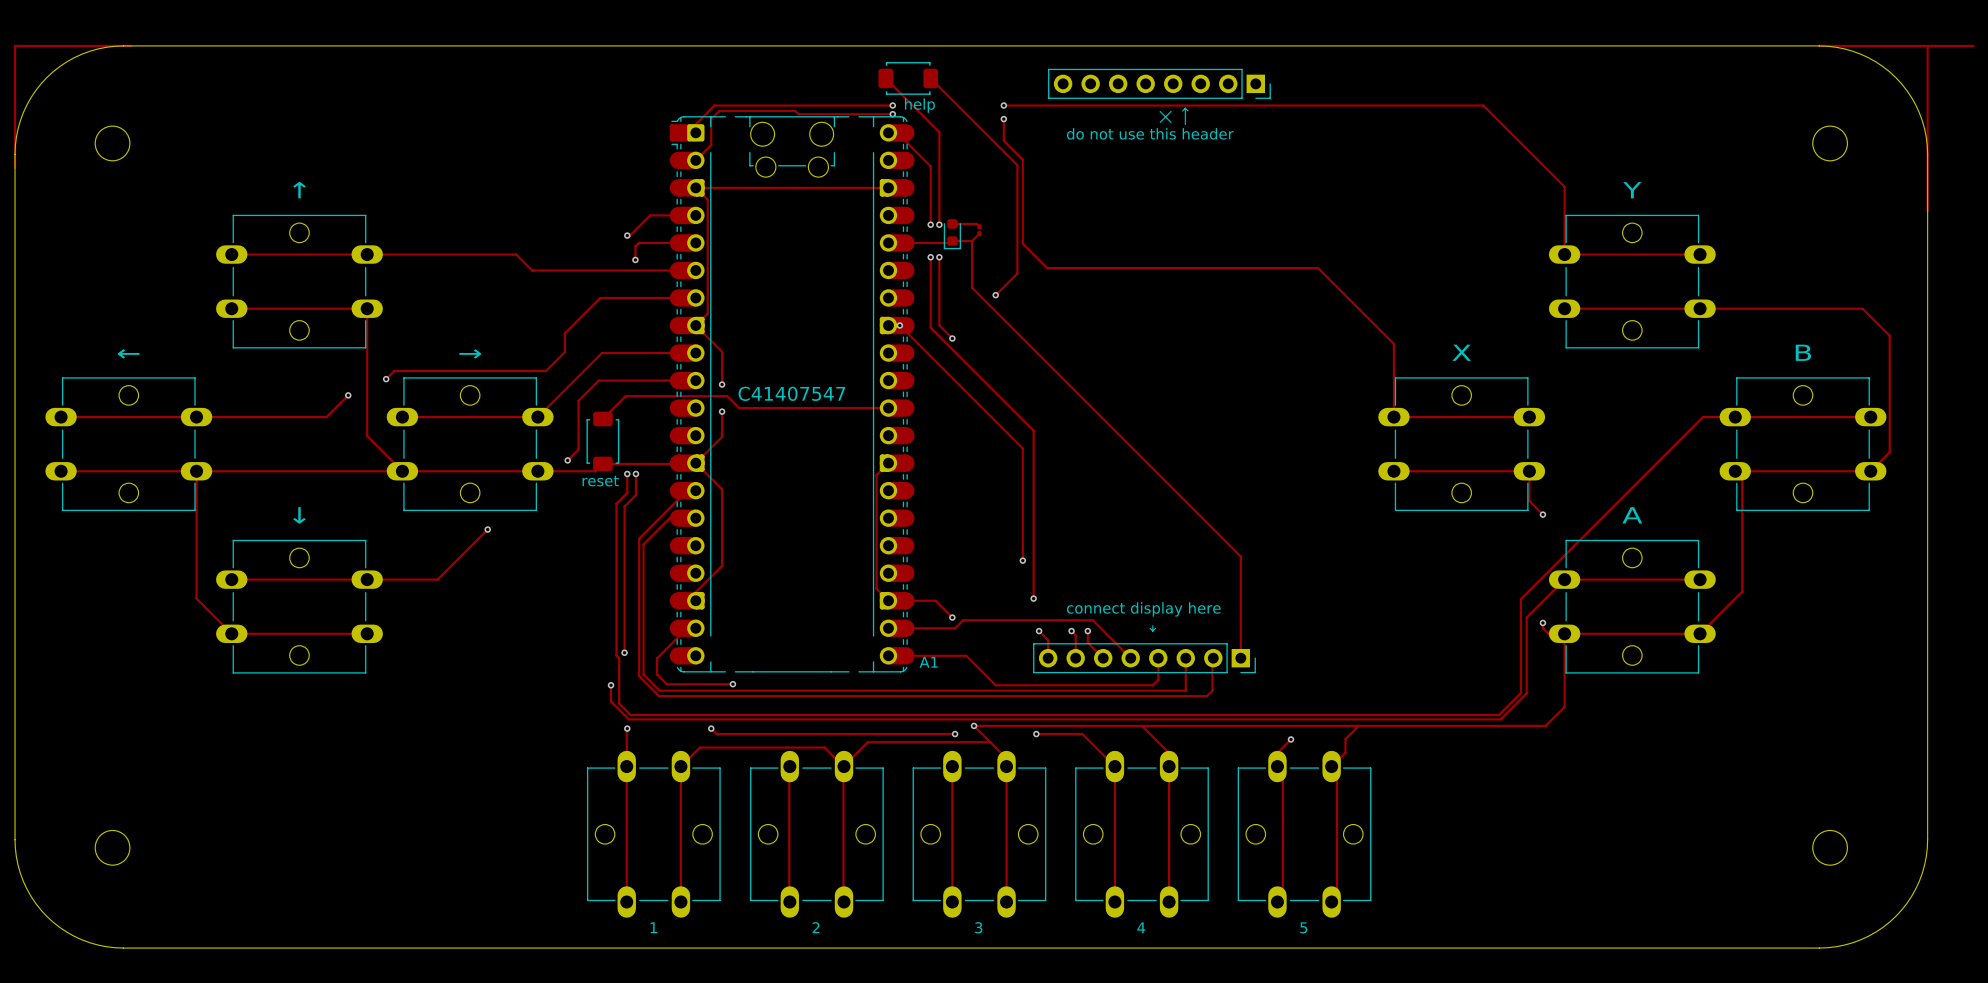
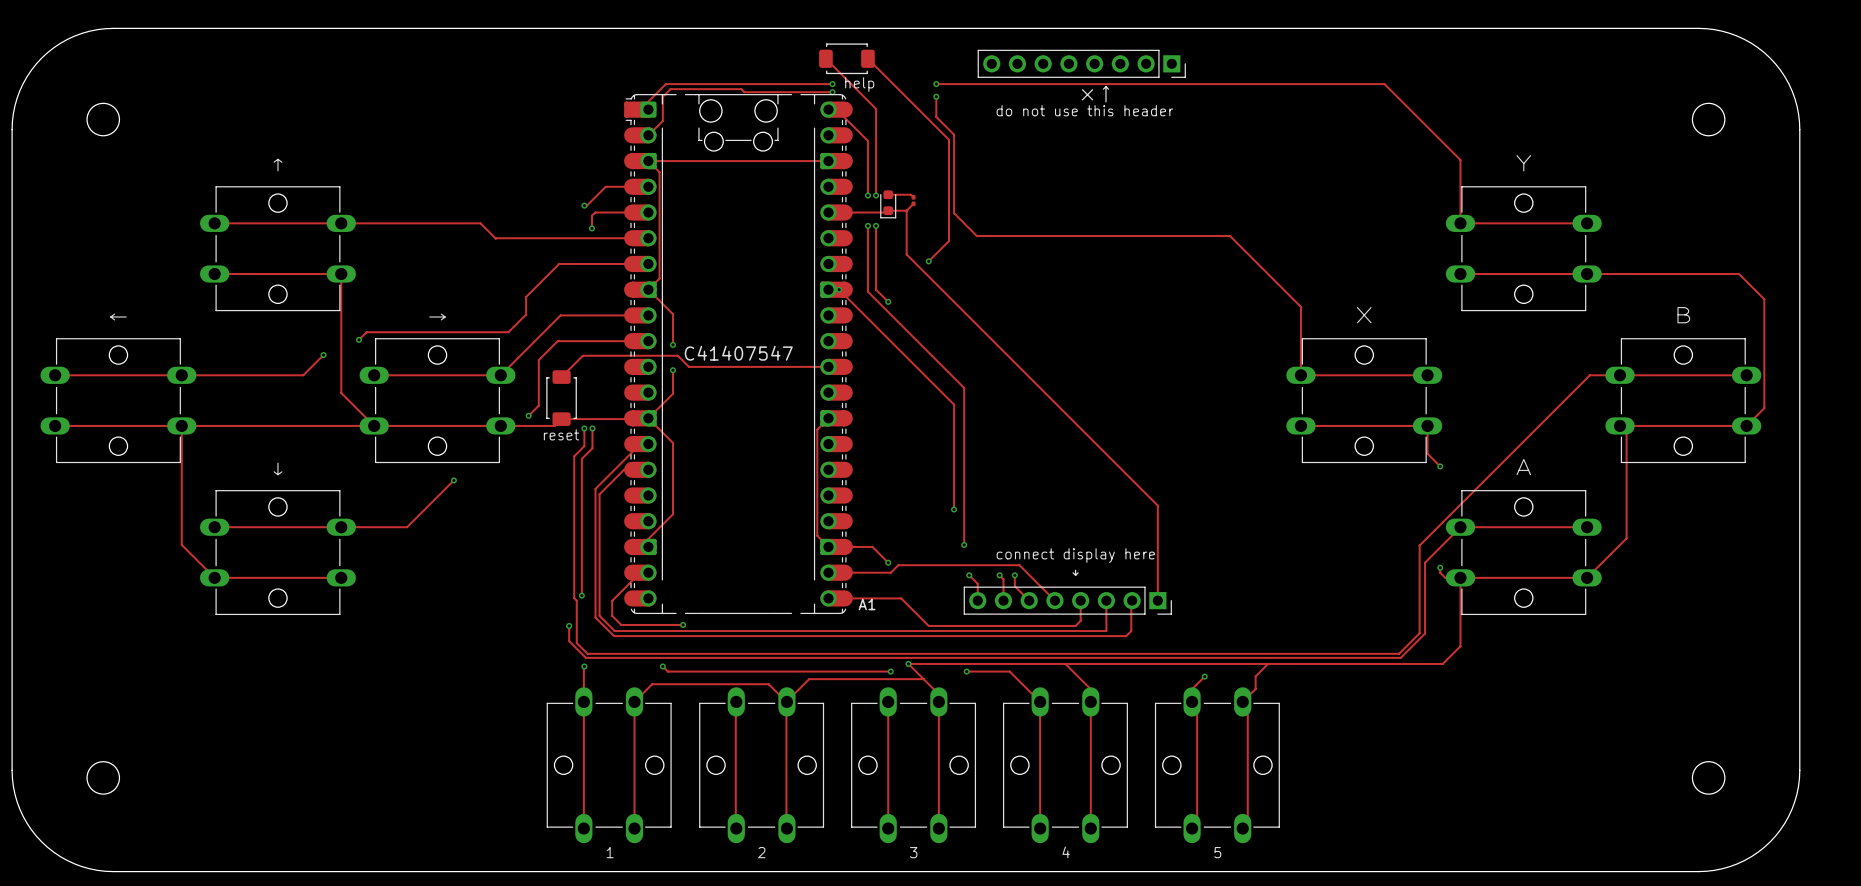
track: (131, 45) (15, 45) (15, 167) -> none
track: (1819, 45) (1973, 45) -> none
track: (1927, 45) (1927, 211) -> none

